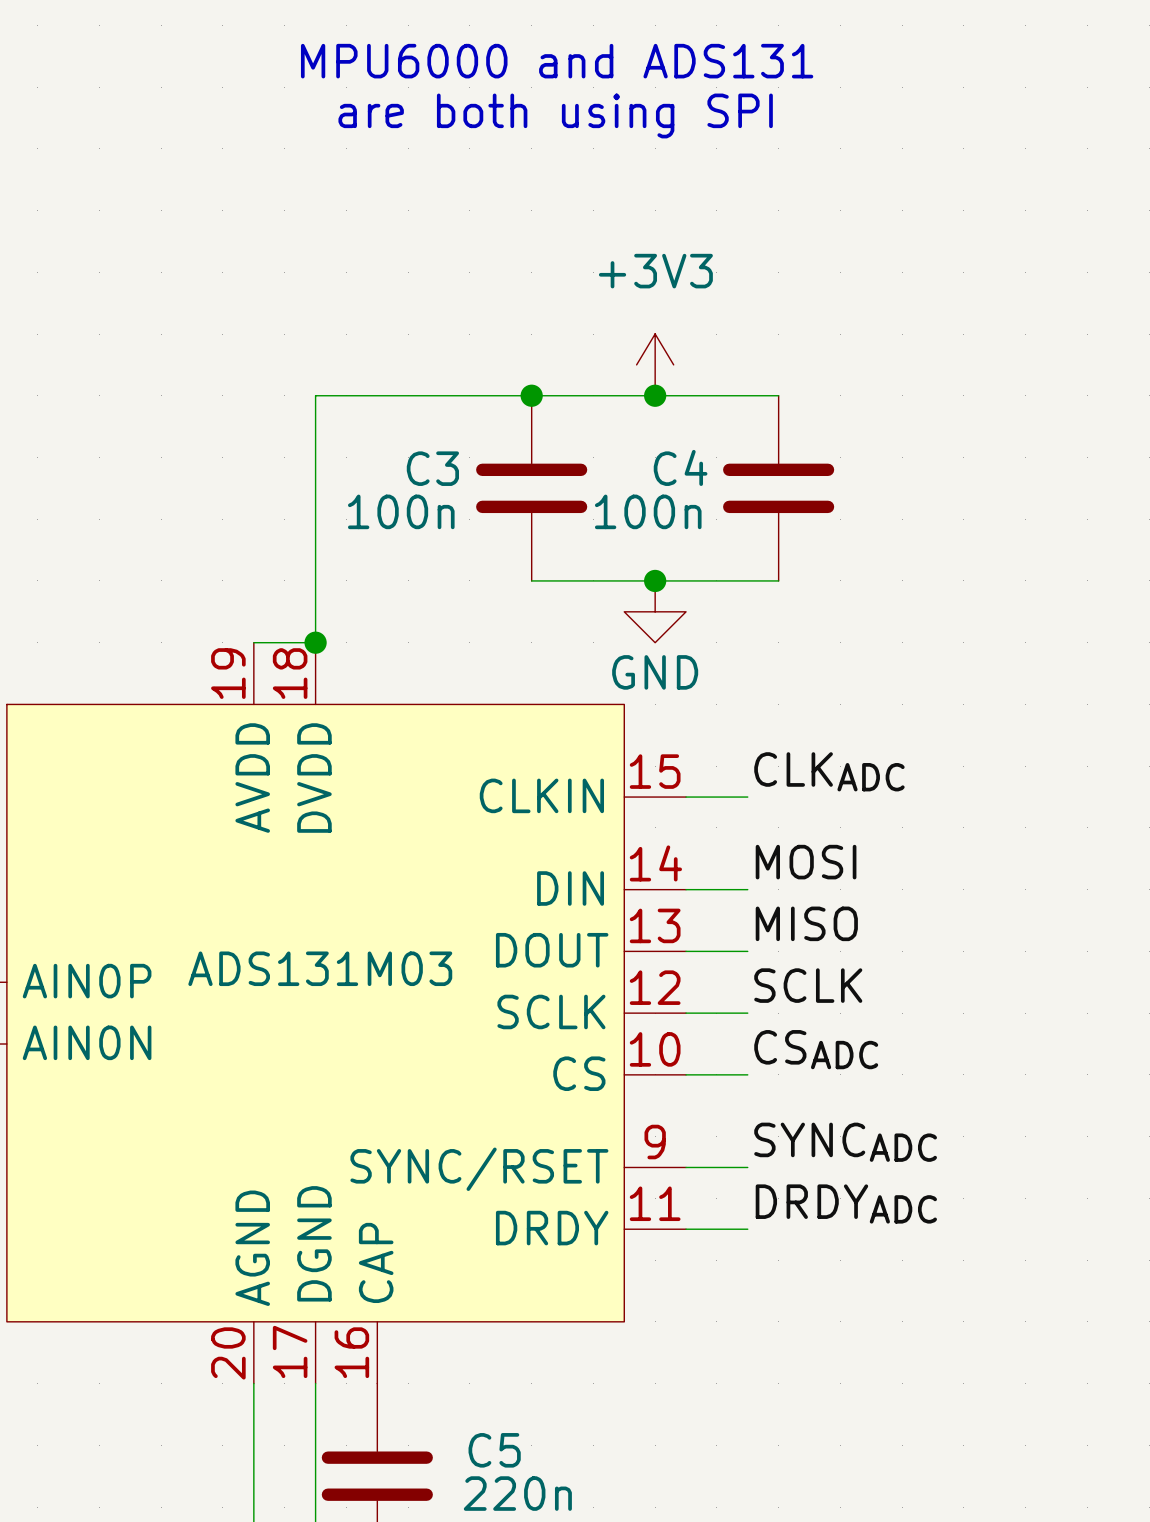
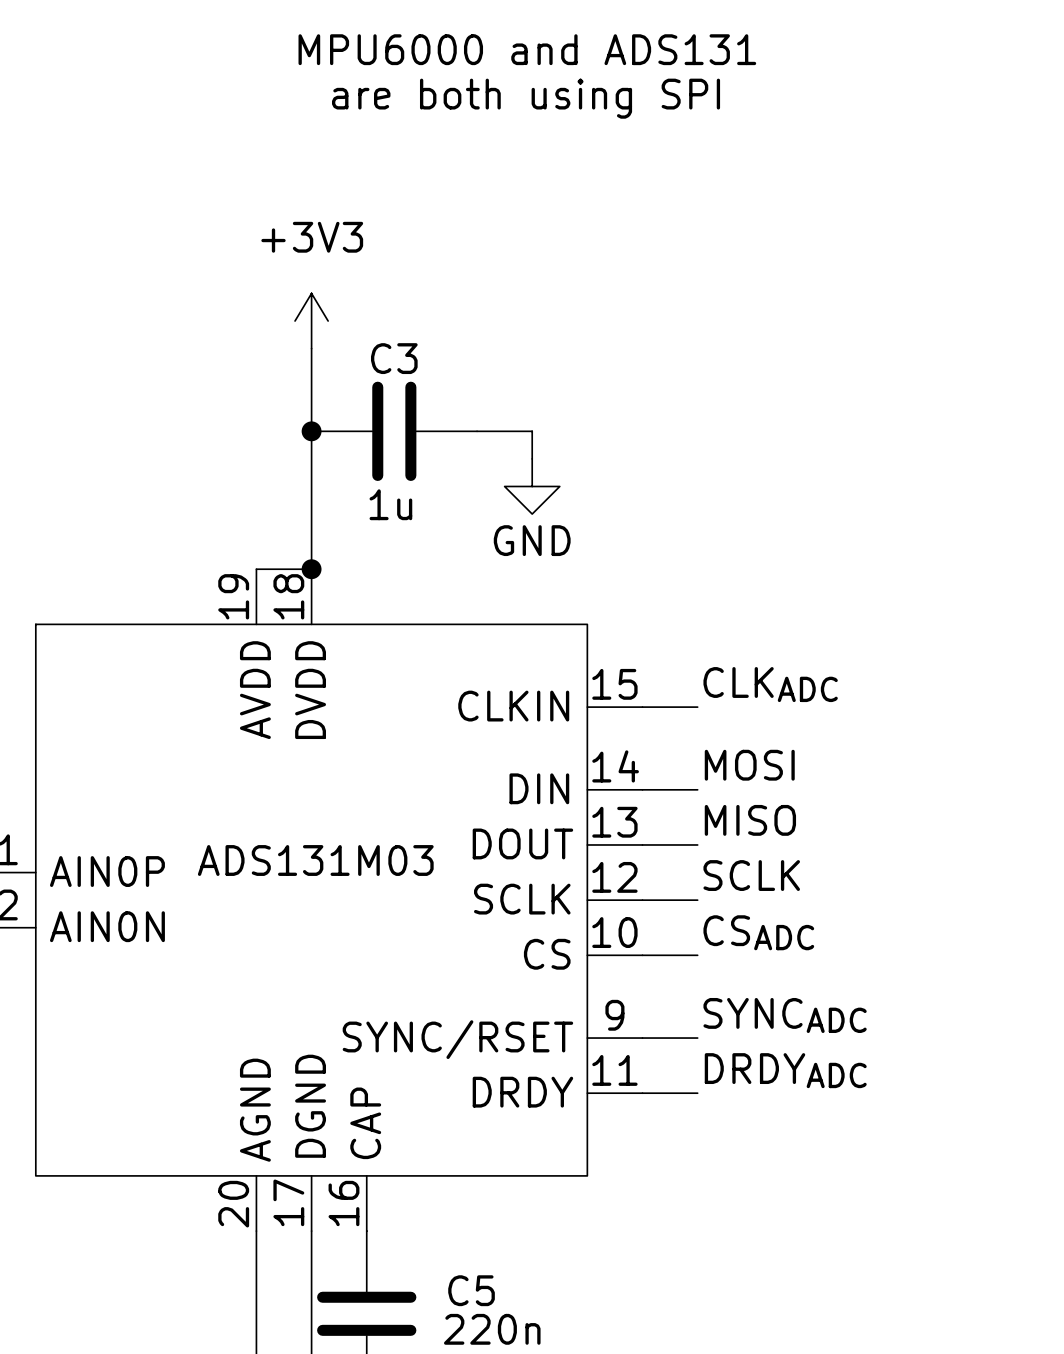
power symbol position: +3V3 (655, 364) -> +3V3 (311, 321)
wire: (315, 395) (778, 395) -> none
junction: (531, 395) -> none
junction: (655, 395) -> none
junction: none -> (311, 431)
wire: none -> (477, 431) (532, 431) (532, 458)
C3 rotation: 0° (531, 488) -> 90° clockwise (394, 431)
C3 position: (531, 488) -> (394, 431)
C4: 100n (778, 488) -> none
C3 value: 100n (401, 511) -> 1u (390, 504)
wire: (531, 580) (778, 580) -> none
junction: (655, 580) -> none
power symbol position: GND (655, 611) -> GND (532, 486)

